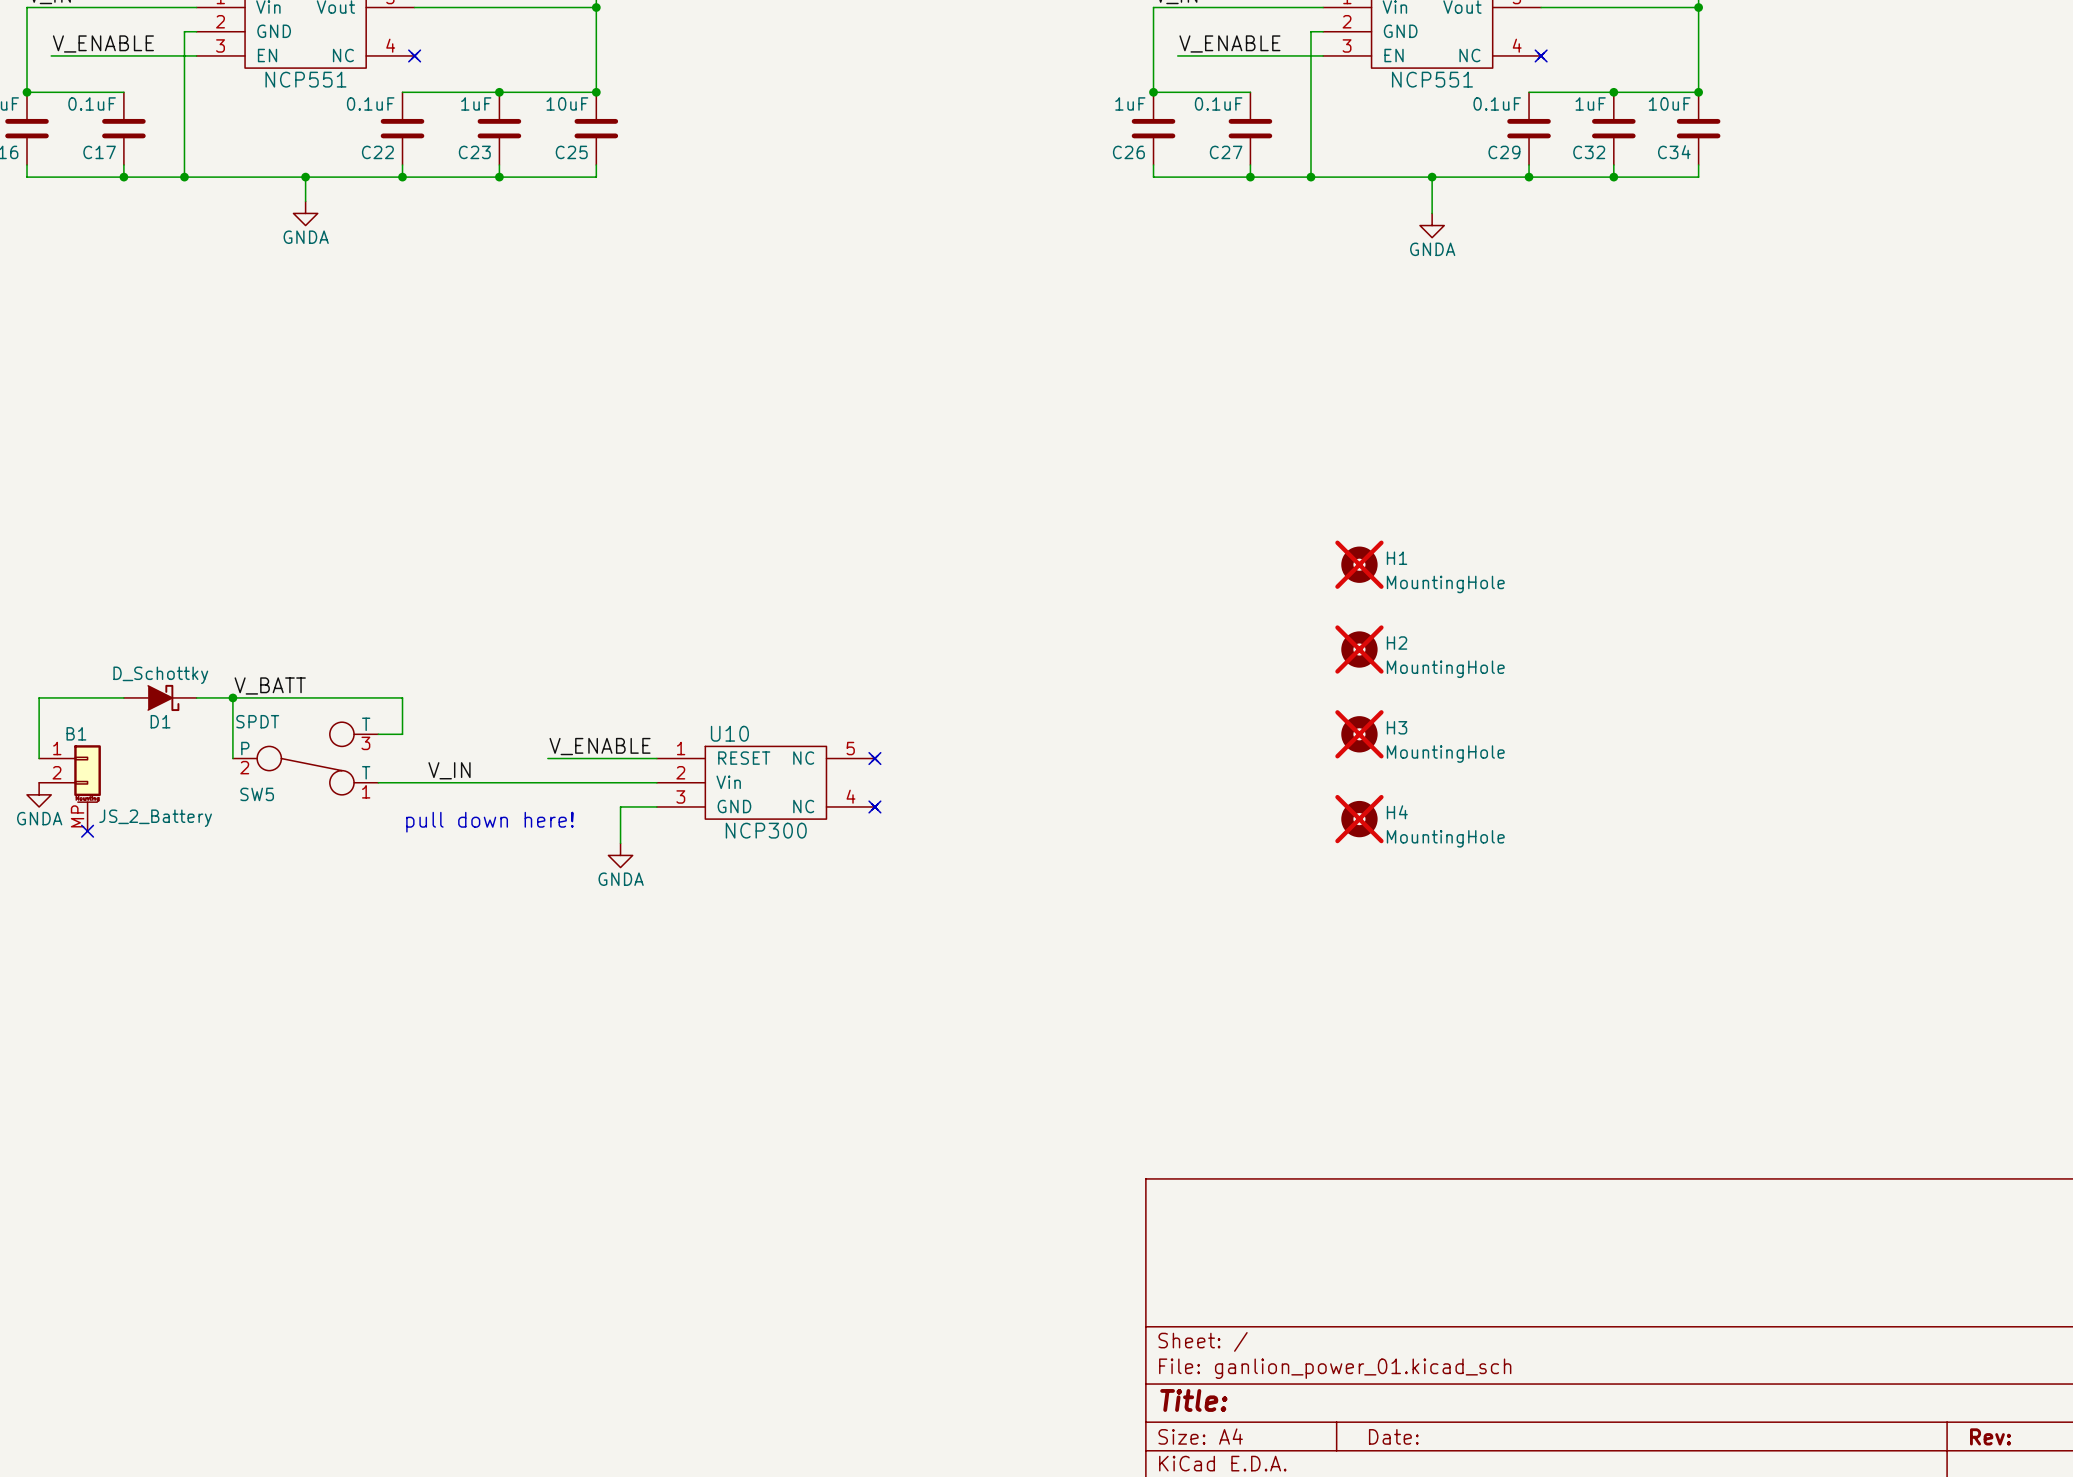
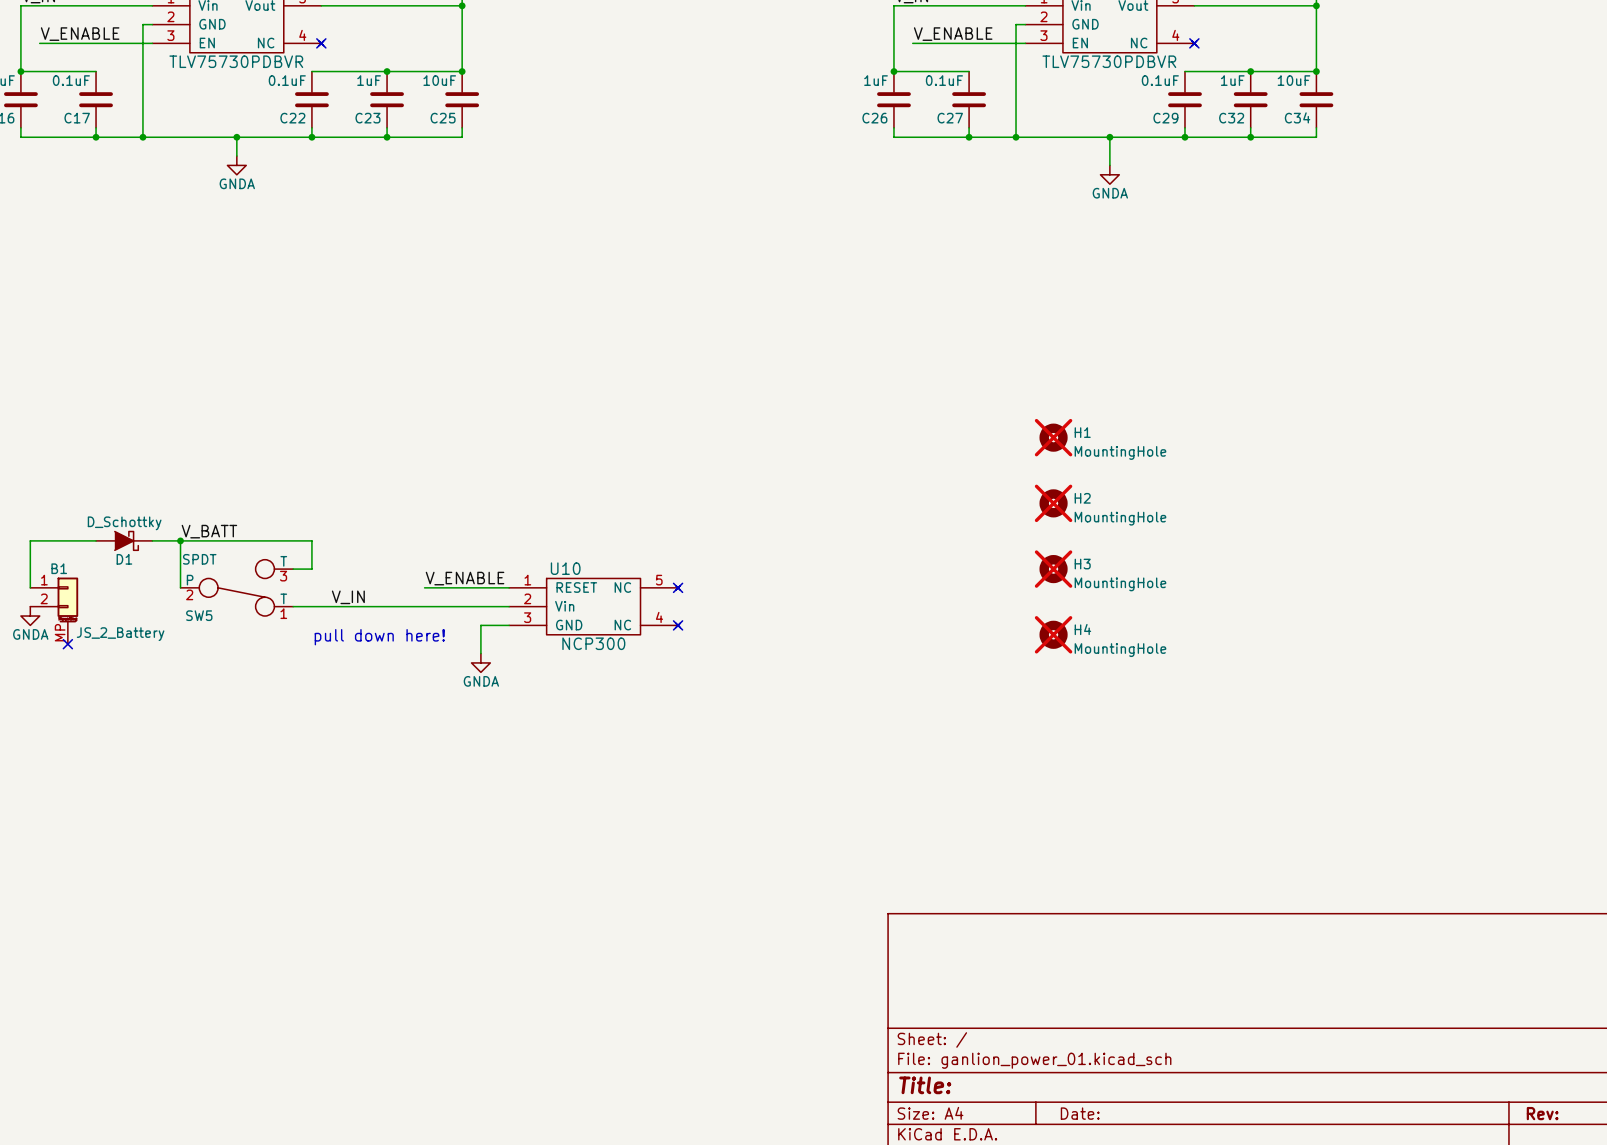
part value: NCP551 (305, 79) -> TLV75730PDBVR (236, 61)
part value: NCP551 (1432, 79) -> TLV75730PDBVR (1109, 61)

